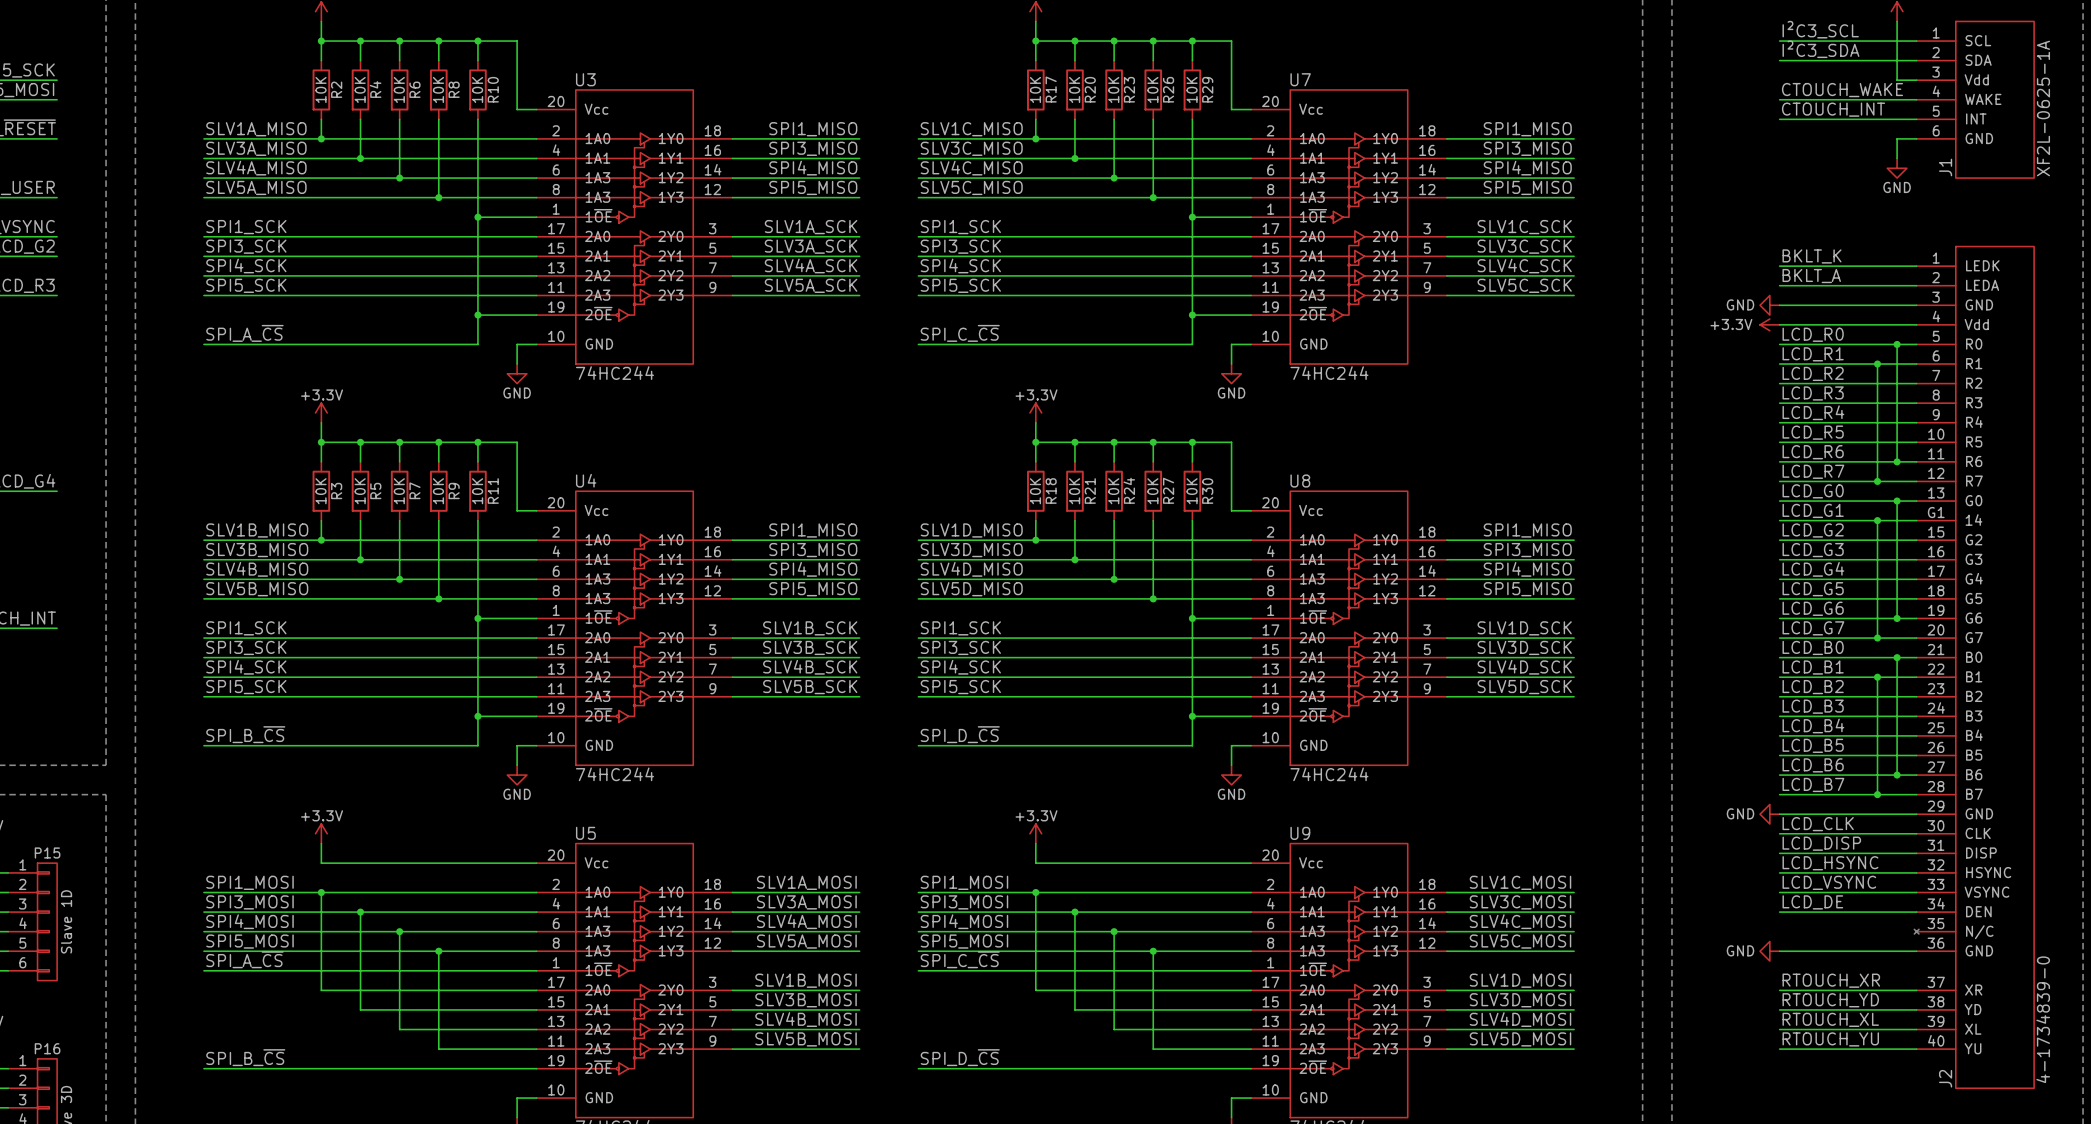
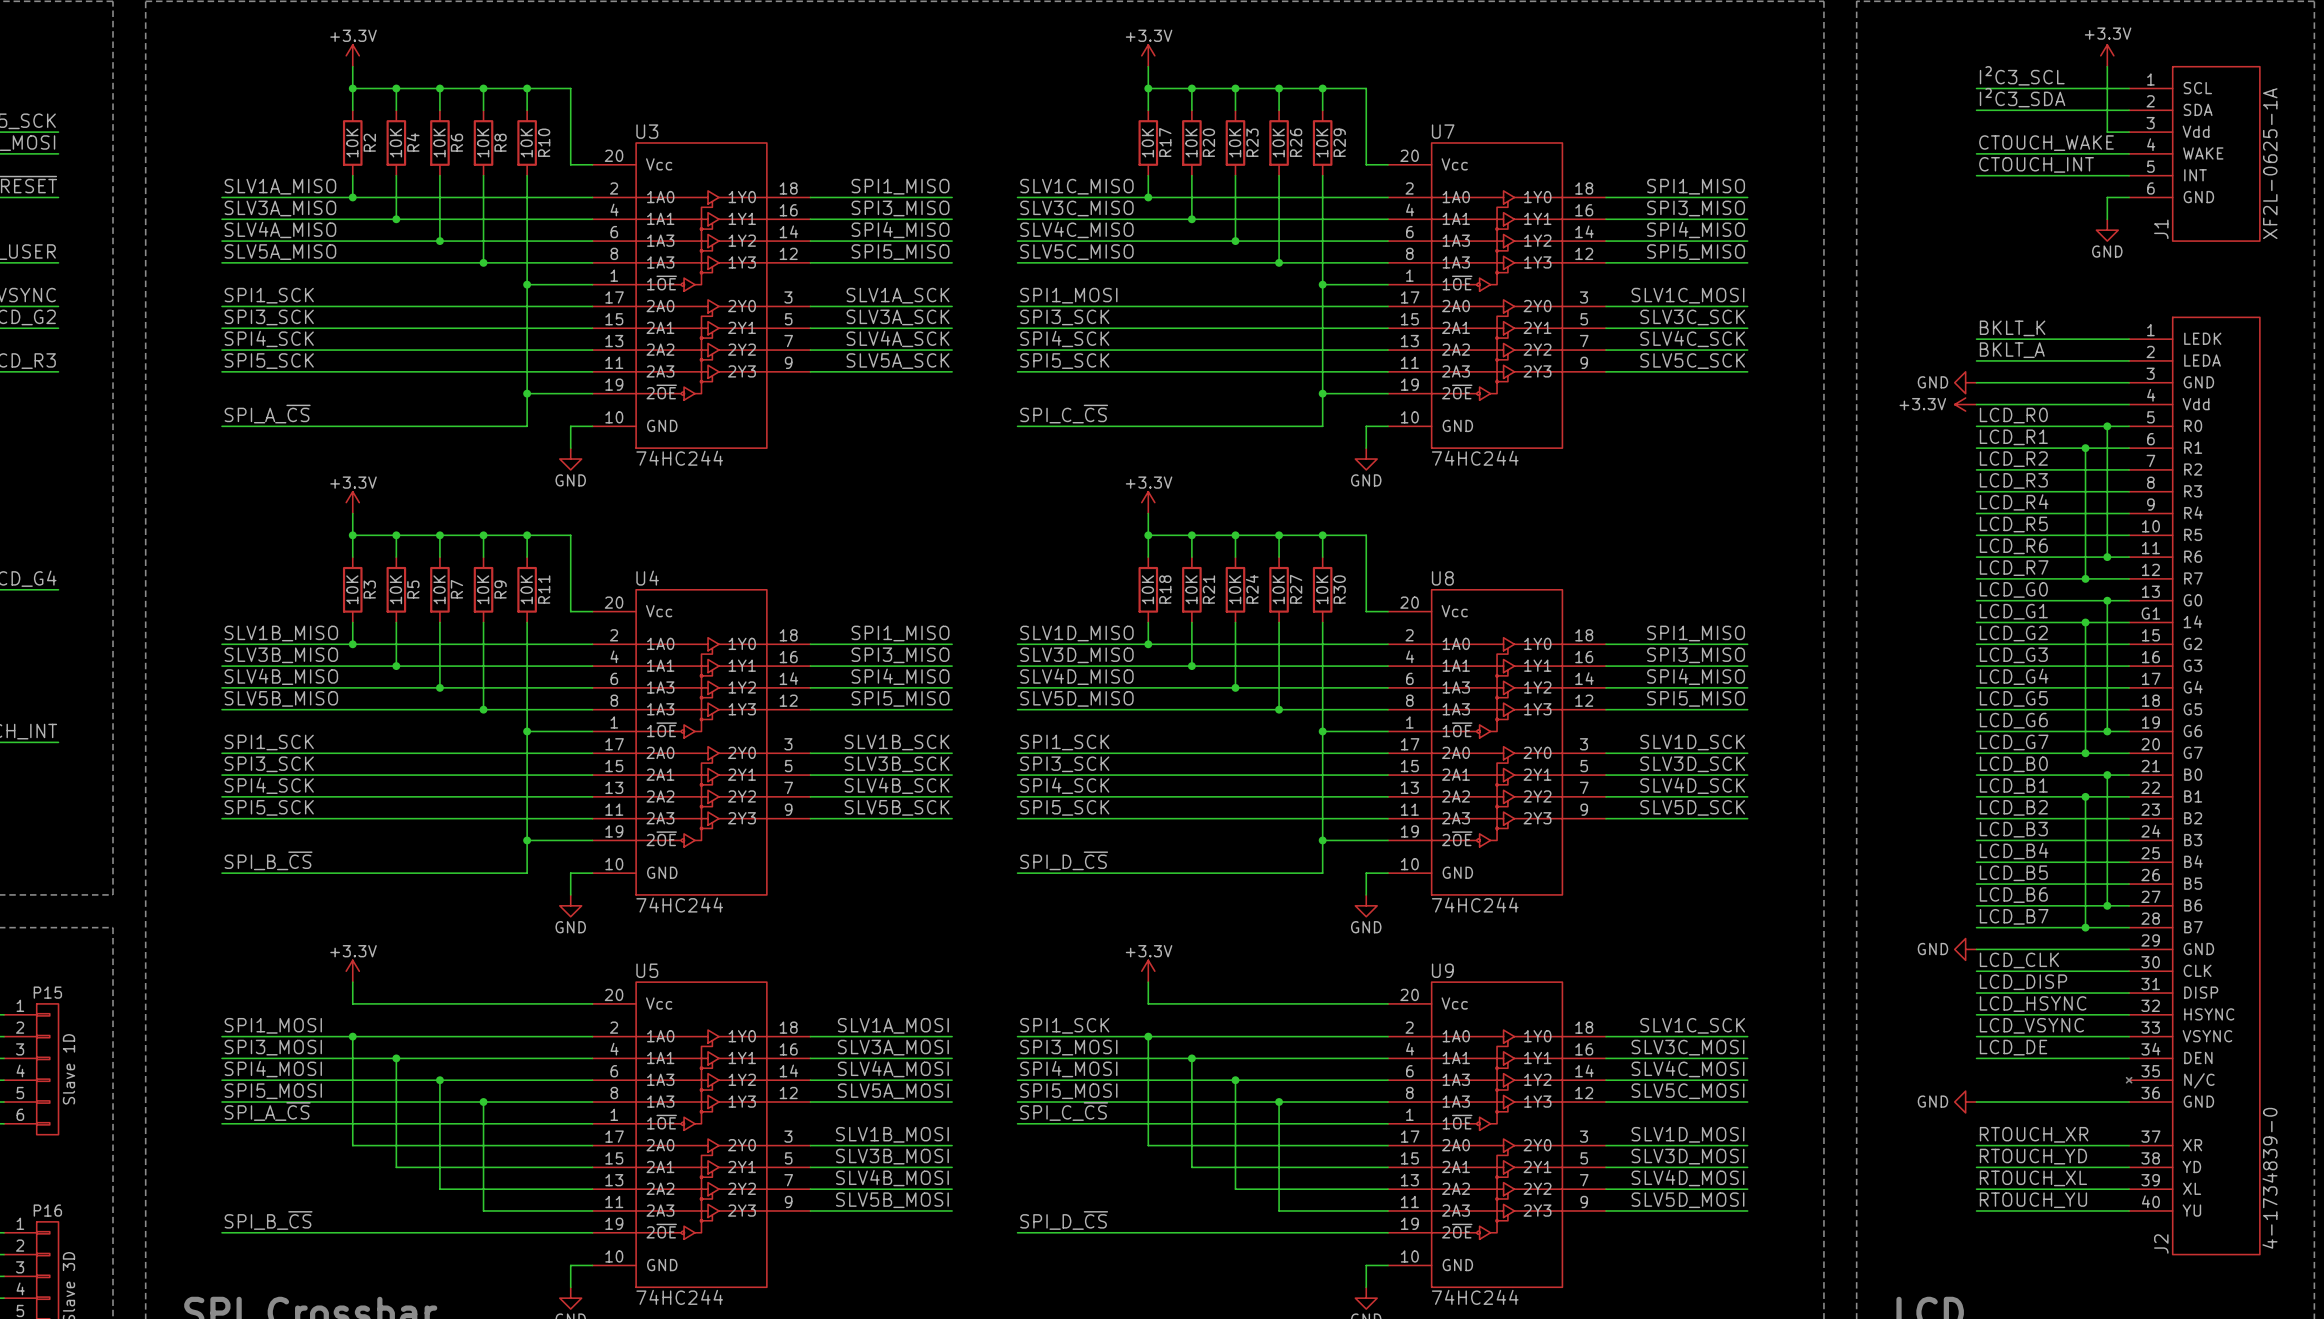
label: SPI1_SCK (960, 227) -> SPI1_MOSI (1068, 295)
label: SLV1C_SCK (1524, 227) -> SLV1C_MOSI (1687, 295)
label: SPI1_MOSI (964, 882) -> SPI1_SCK (1064, 1025)
label: SLV1C_MOSI (1520, 882) -> SLV1C_SCK (1692, 1025)

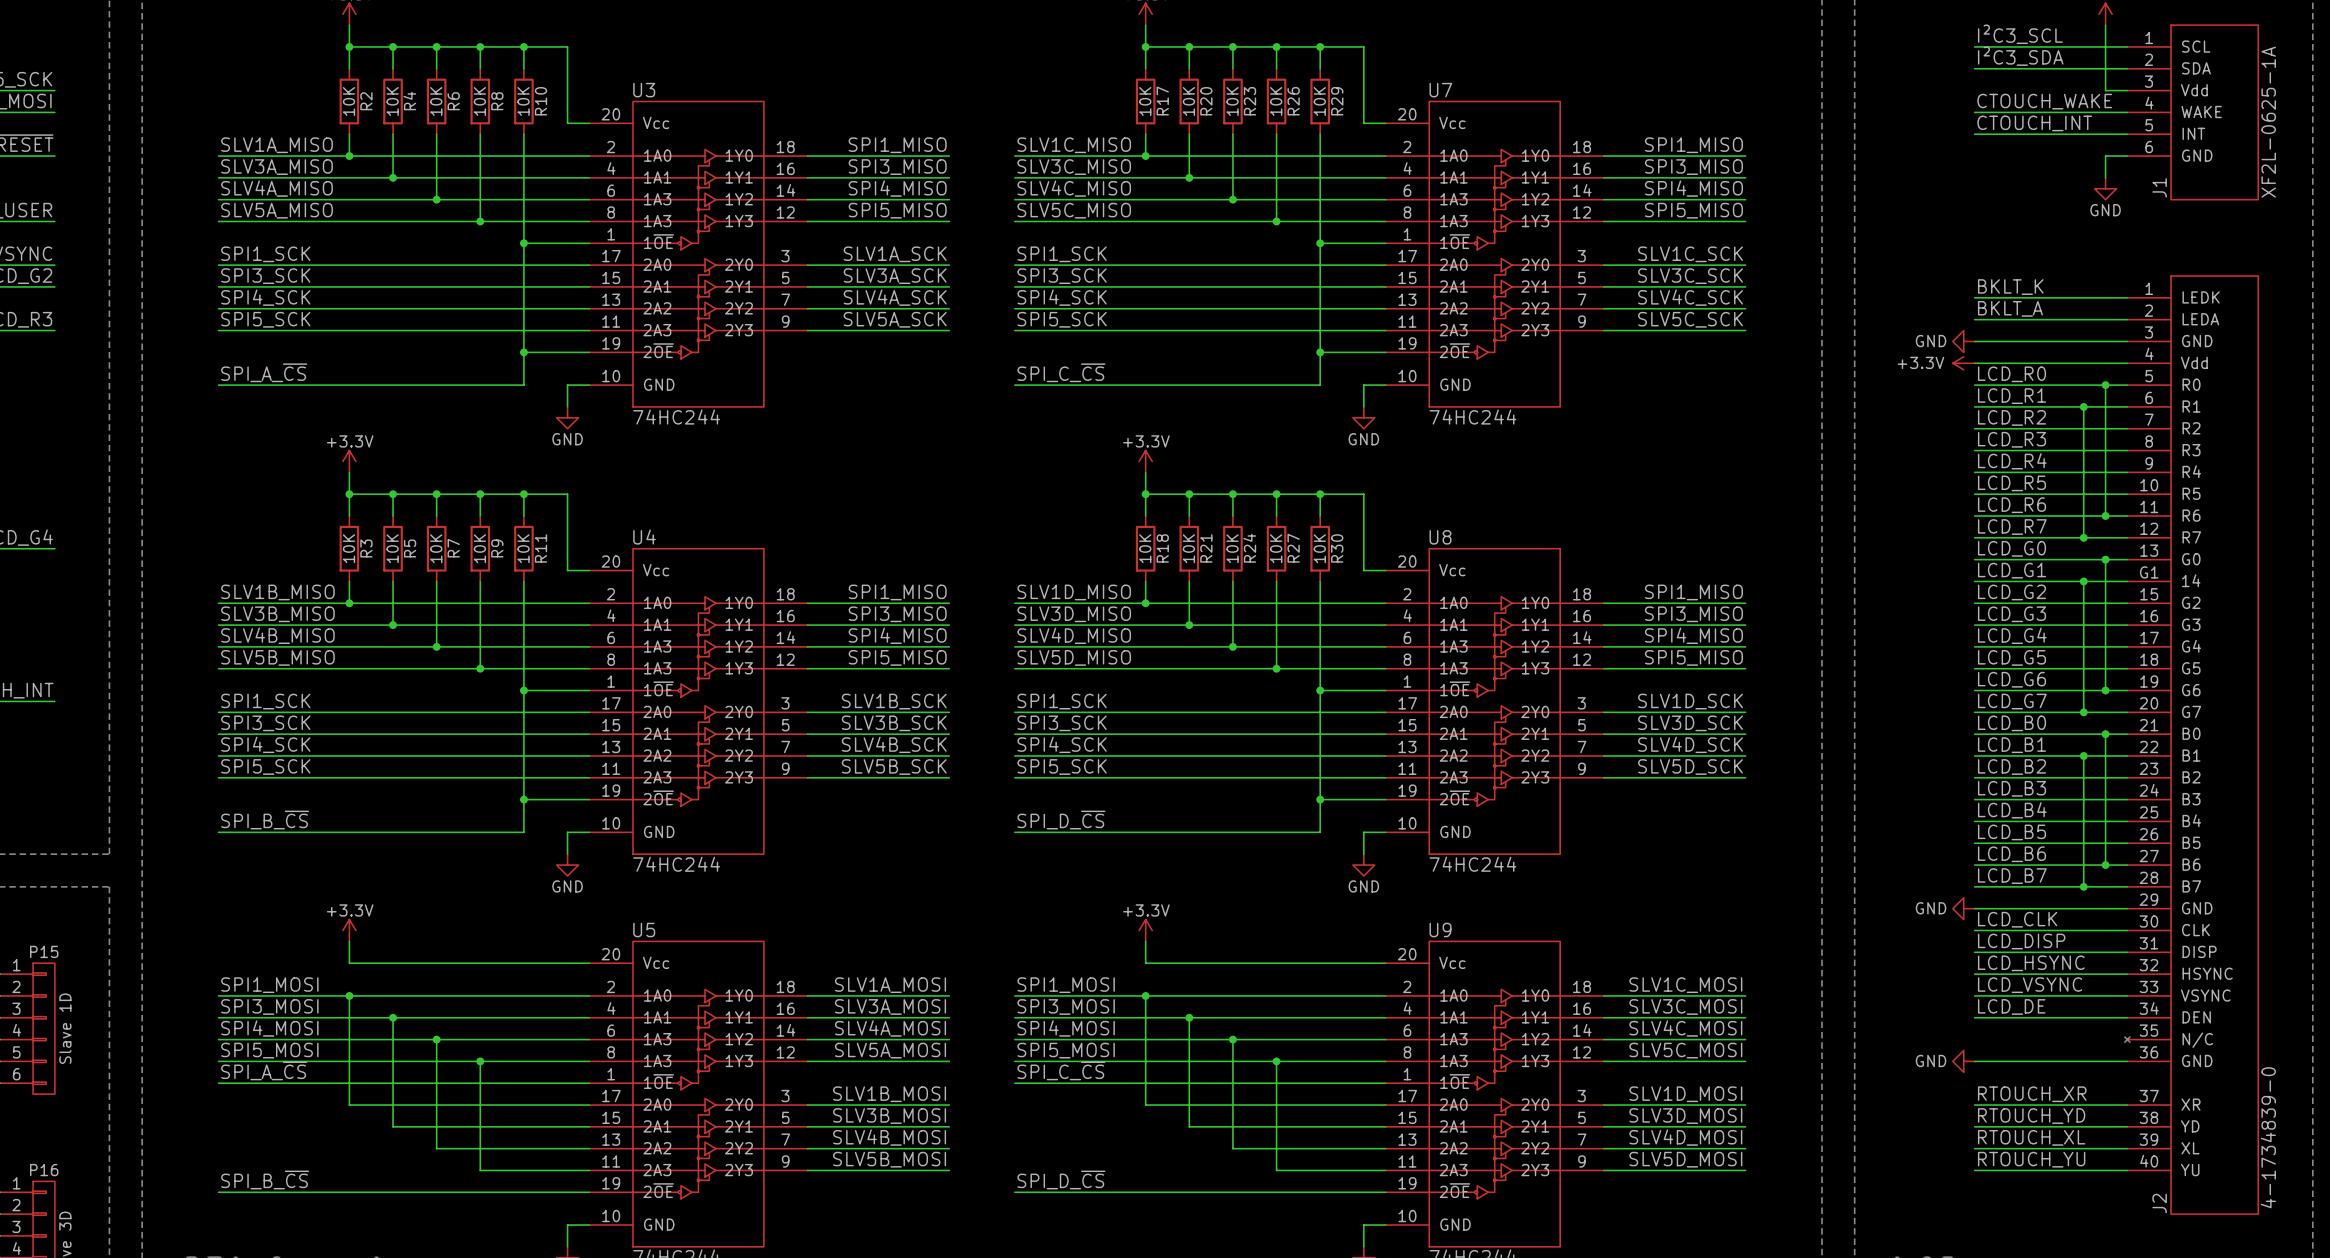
label: SPI1_MOSI (1068, 295) -> SPI1_SCK (1062, 254)
label: SLV1C_MOSI (1687, 295) -> SLV1C_SCK (1690, 254)
label: SPI1_SCK (1064, 1025) -> SPI1_MOSI (1066, 985)
label: SLV1C_SCK (1692, 1025) -> SLV1C_MOSI (1685, 985)

